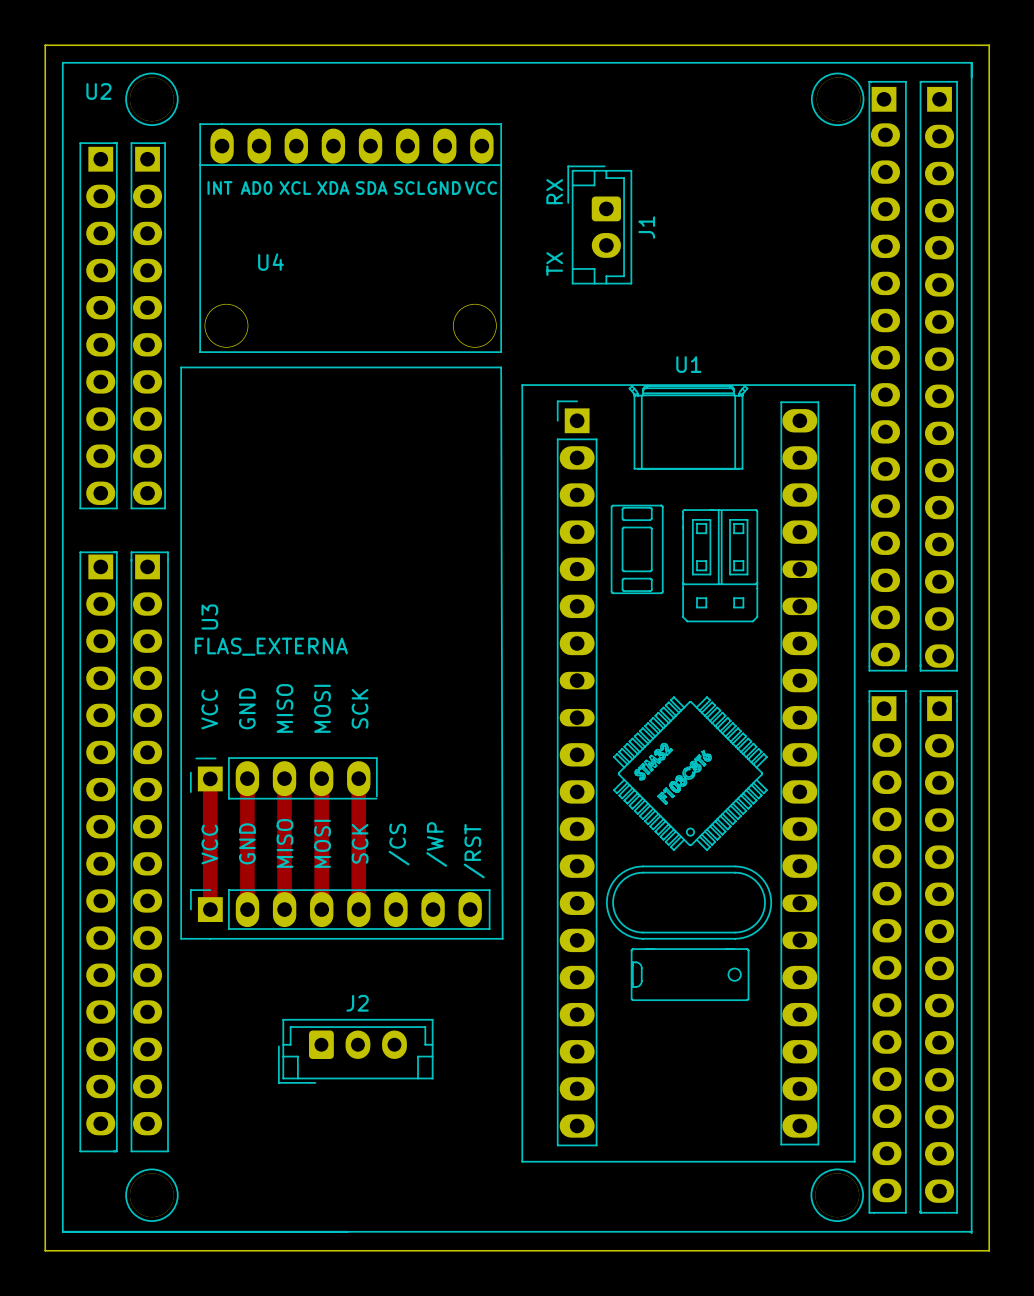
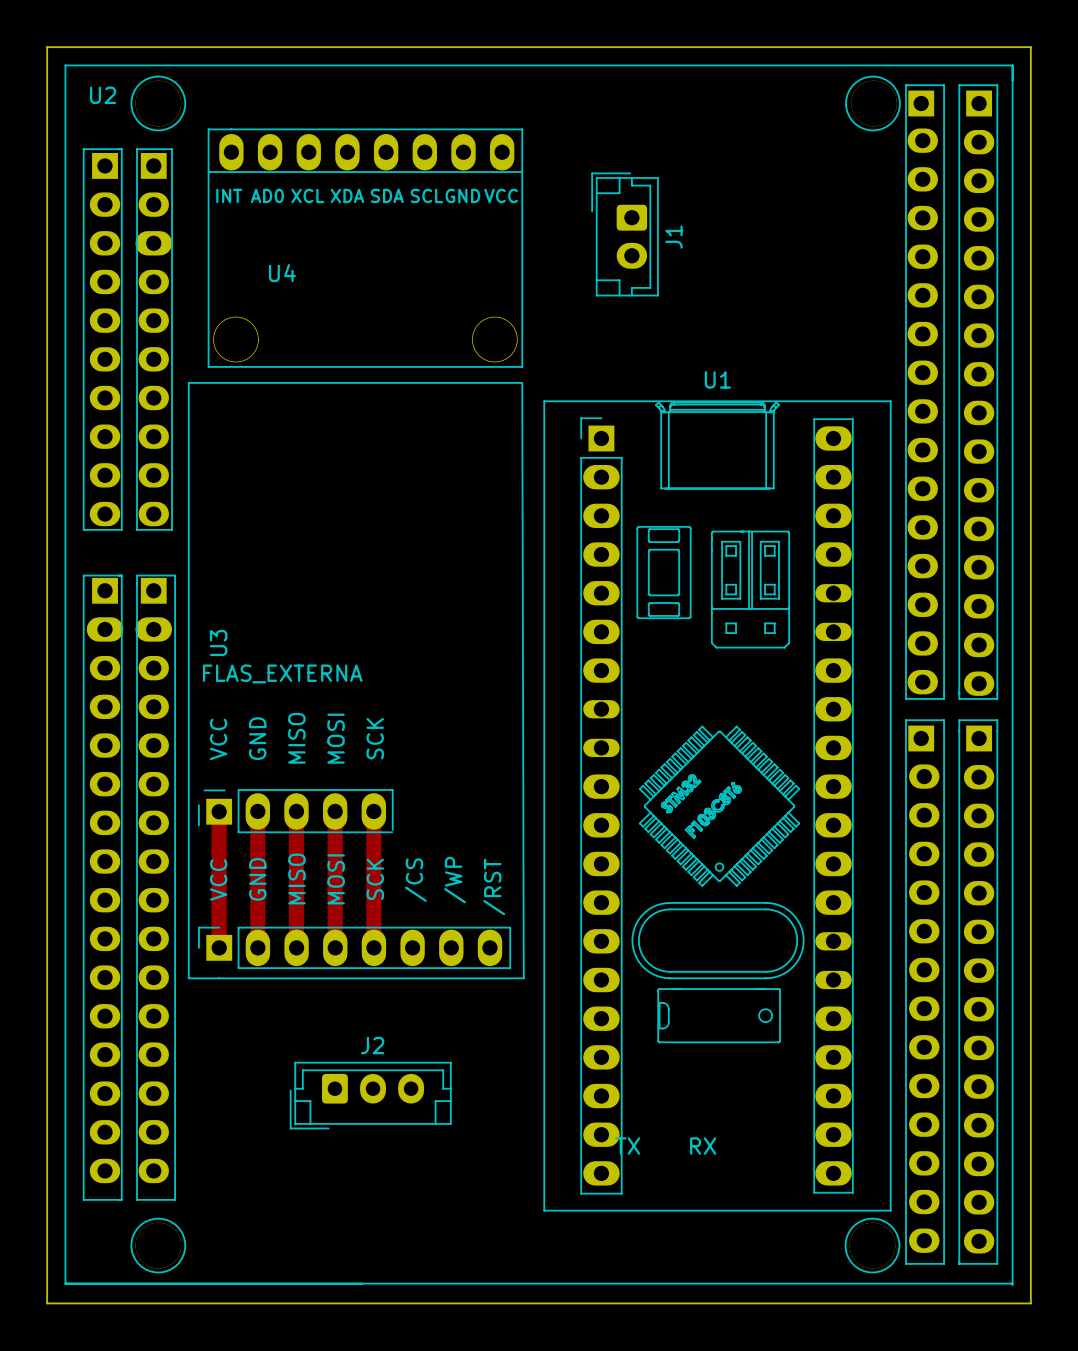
U2 footprint: [61, 61, 973, 1235] -> [64, 64, 1014, 1287]

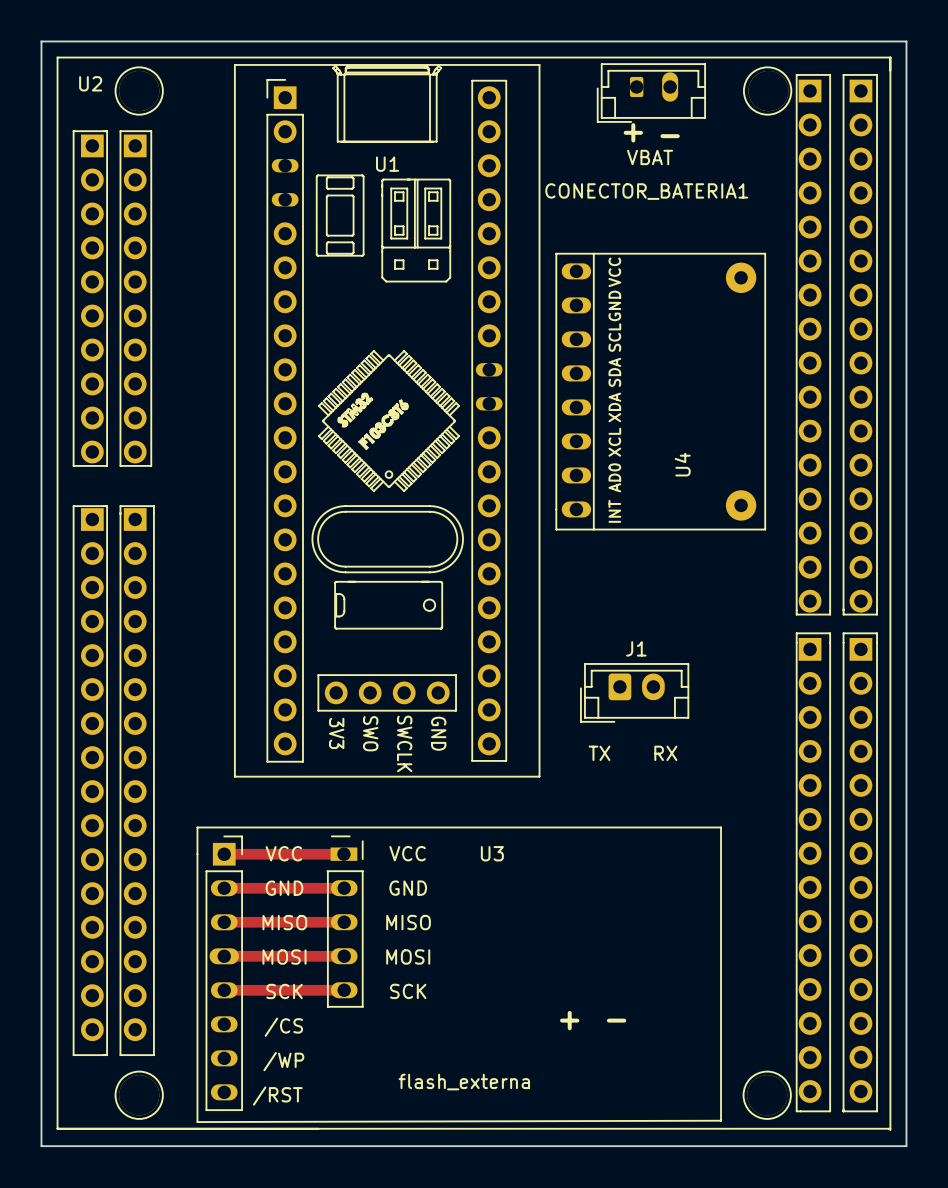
U2 footprint: [64, 64, 1014, 1287] -> [56, 56, 892, 1131]
CONECTOR_BATERIA1: none -> VBAT (651, 93)
U4 footprint: [207, 128, 524, 368] -> [555, 252, 767, 531]
text: none -> + (633, 132)
text: none -> - (670, 136)
J1 rotation: 0° (625, 234) -> 90° counterclockwise (634, 692)
J1 position: (625, 234) -> (634, 692)
U4 name position: U4 (282, 273) -> U4 (682, 464)
U1 name position: U1 (717, 379) -> U1 (387, 164)
U3 footprint: [187, 382, 525, 980] -> [196, 826, 722, 1123]
U1 footprint: [543, 400, 892, 1212] -> [234, 64, 541, 778]
U3 name position: U3 (218, 642) -> U3 (492, 853)
U3 value: FLAS_EXTERNA (282, 673) -> flash_externa (464, 1082)
track: (219, 811) (219, 947) -> none
track: (257, 811) (257, 947) -> none
track: (296, 811) (296, 947) -> none
track: (335, 811) (335, 947) -> none
track: (373, 811) (373, 947) -> none
track: none -> (224, 854) (343, 854)
track: none -> (224, 888) (344, 888)
track: none -> (224, 922) (344, 922)
track: none -> (224, 956) (344, 956)
J2: (370, 1095) -> none
track: none -> (224, 990) (344, 990)
text: none -> + (569, 1020)
text: none -> - (616, 1020)

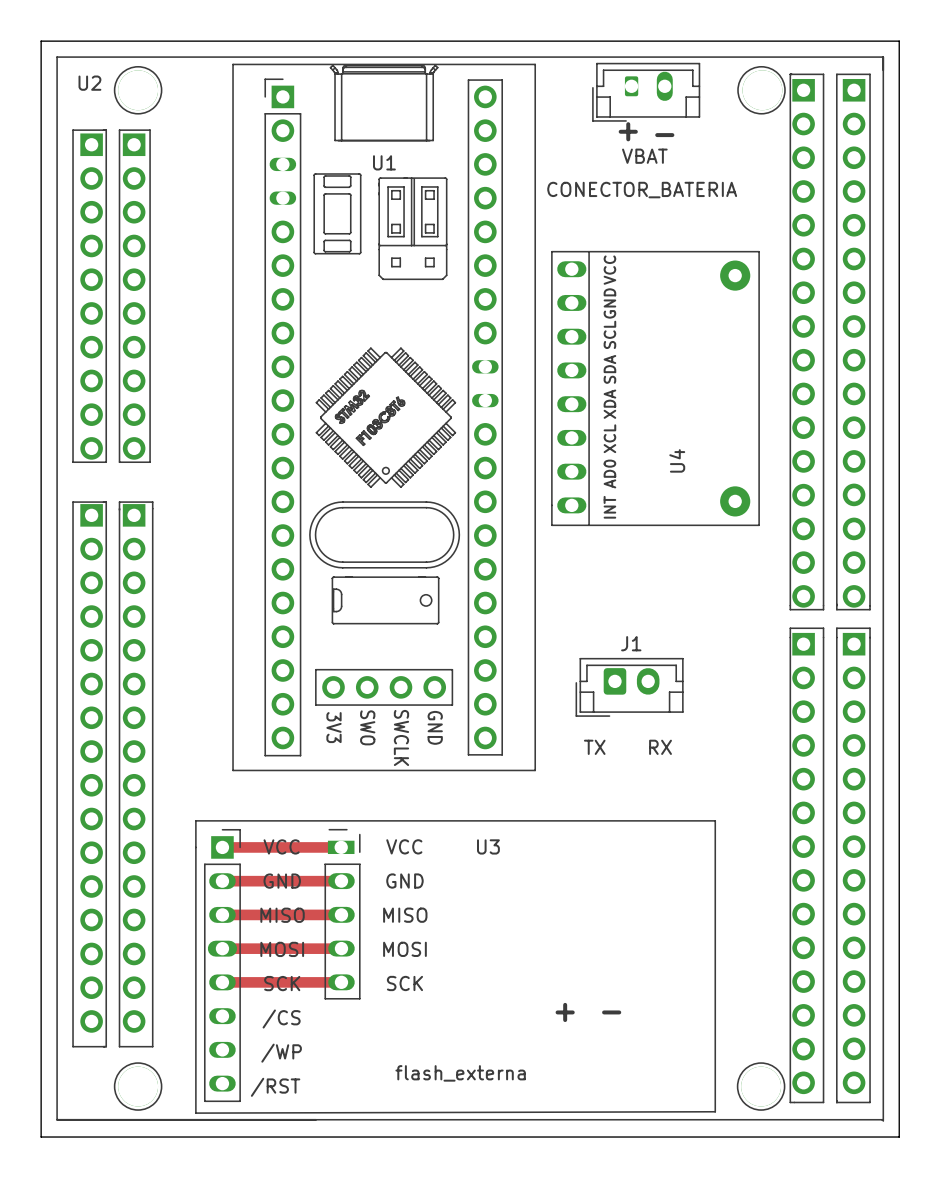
CONECTOR_BATERIA1 name: CONECTOR_BATERIA1 (646, 191) -> CONECTOR_BATERIA (642, 190)

